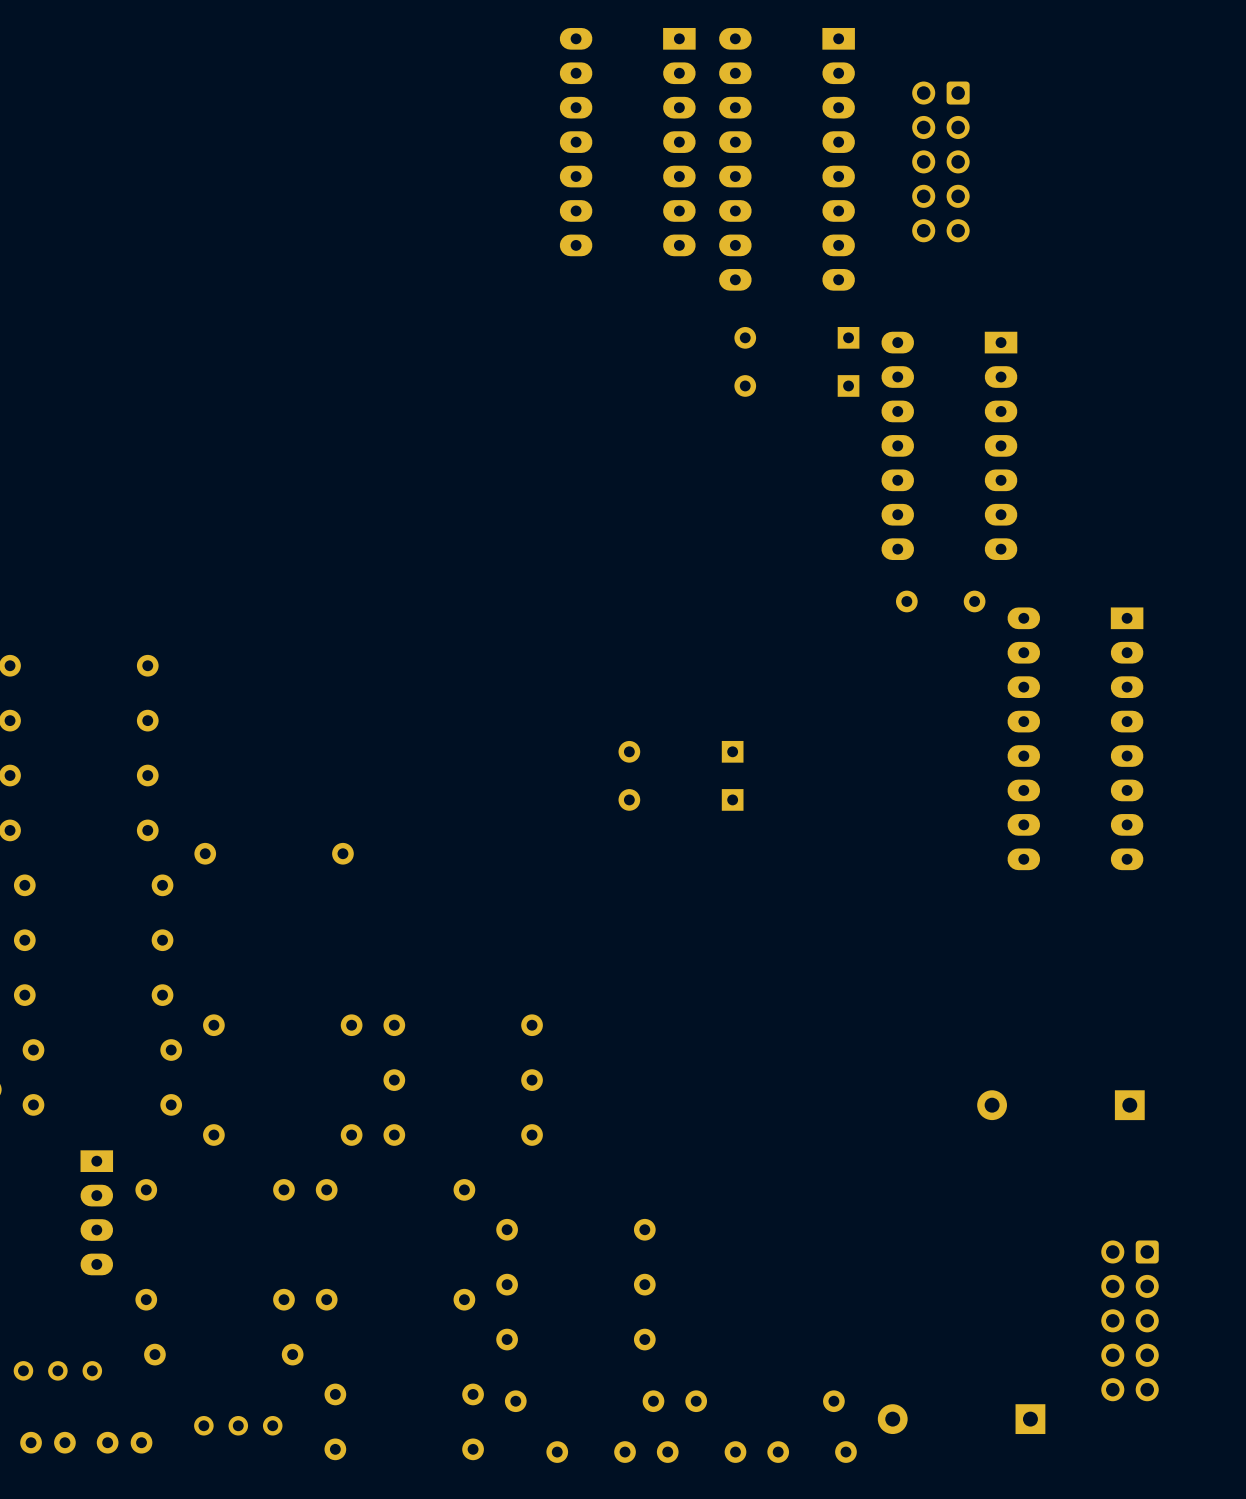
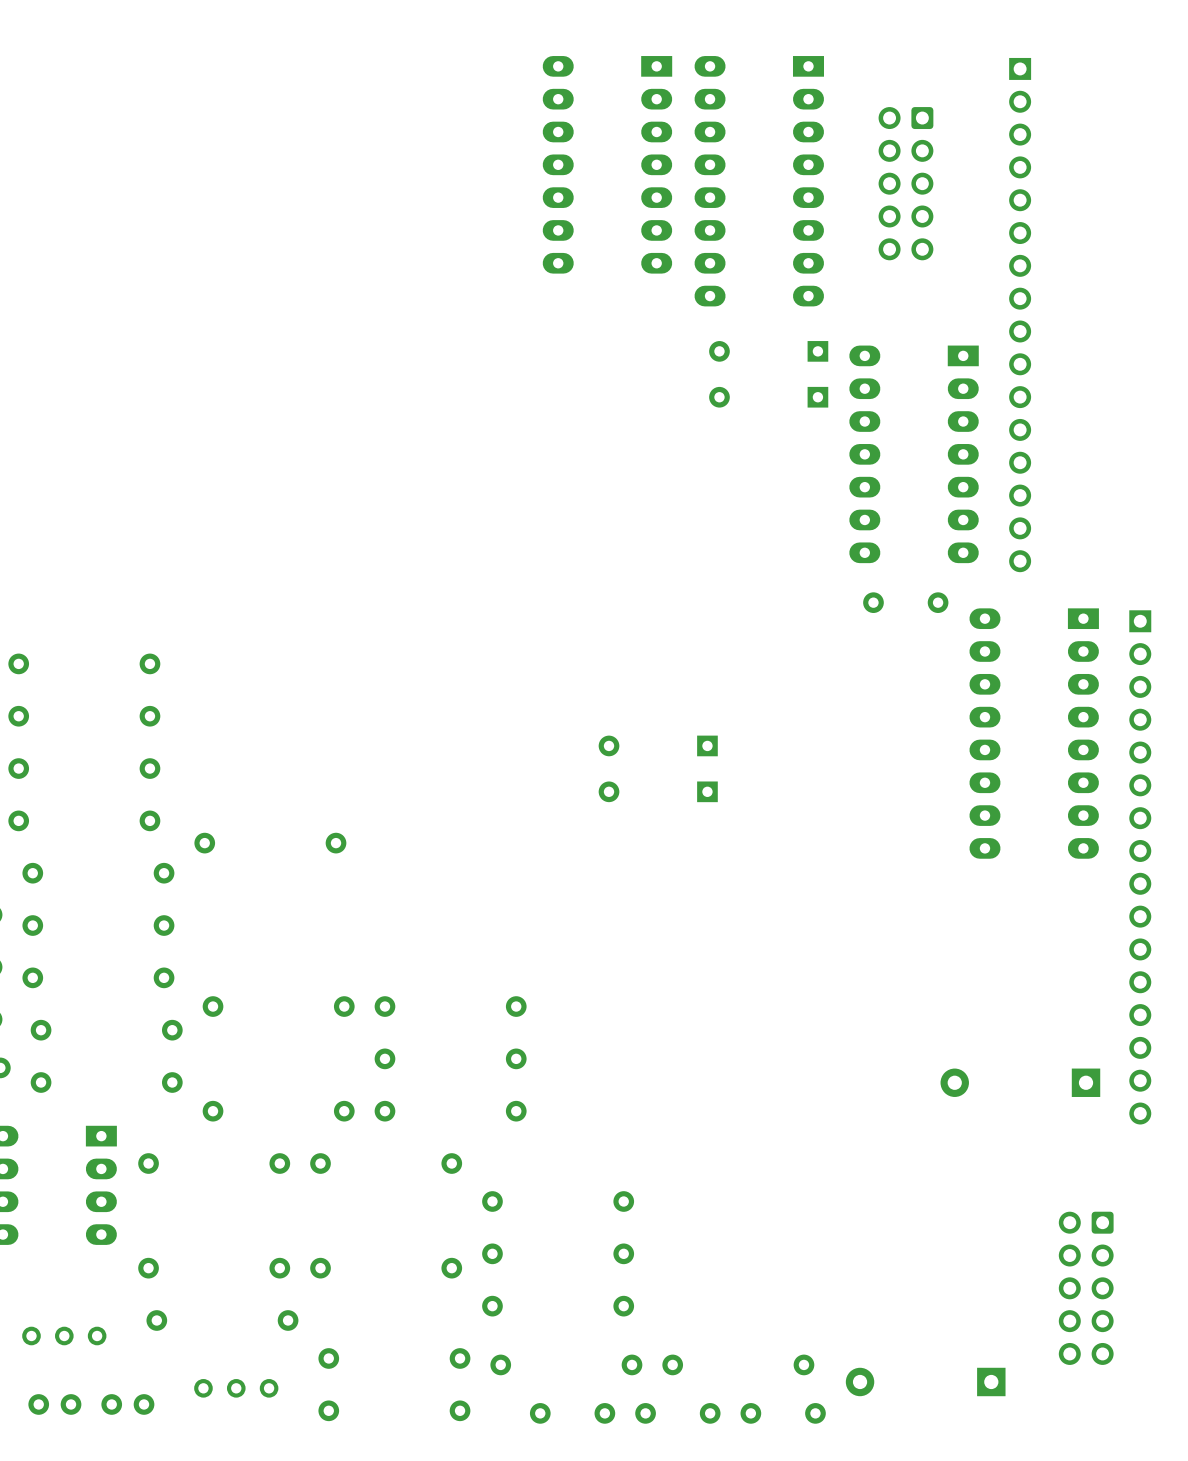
part: none -> (1020, 315)
part: none -> (1140, 867)

